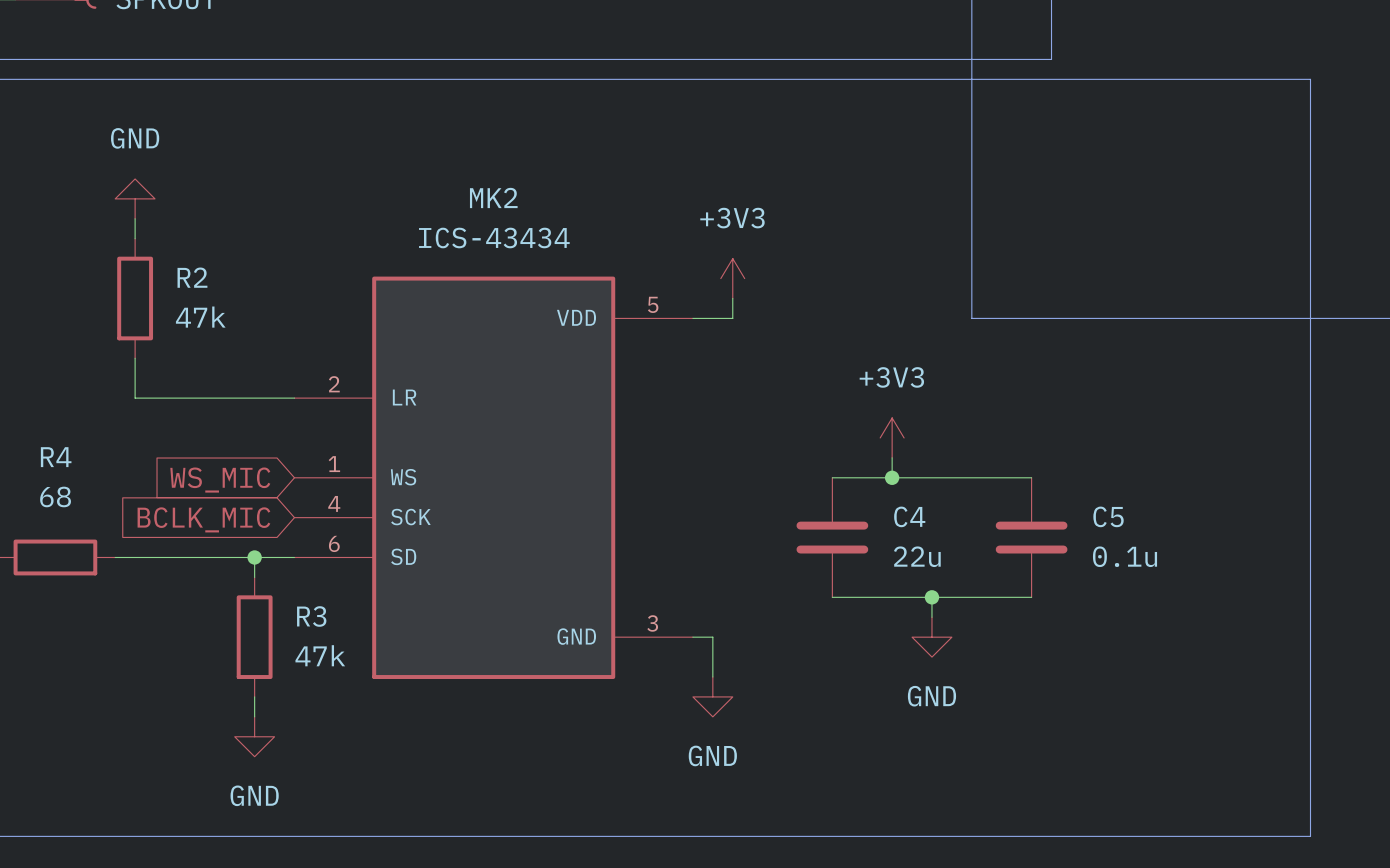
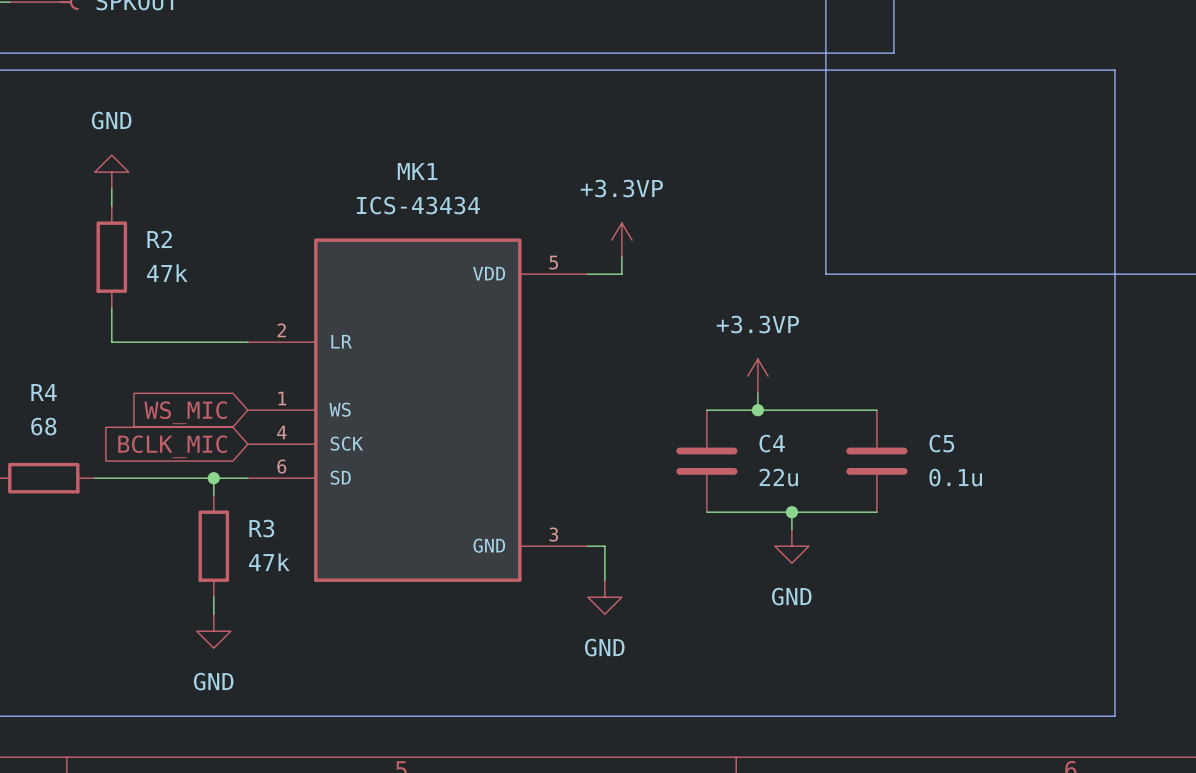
MK2 name: MK2 (493, 197) -> MK1 (417, 171)
power symbol: +3V3 (732, 278) -> +3.3VP (621, 240)
power symbol: +3V3 (892, 437) -> +3.3VP (757, 376)

